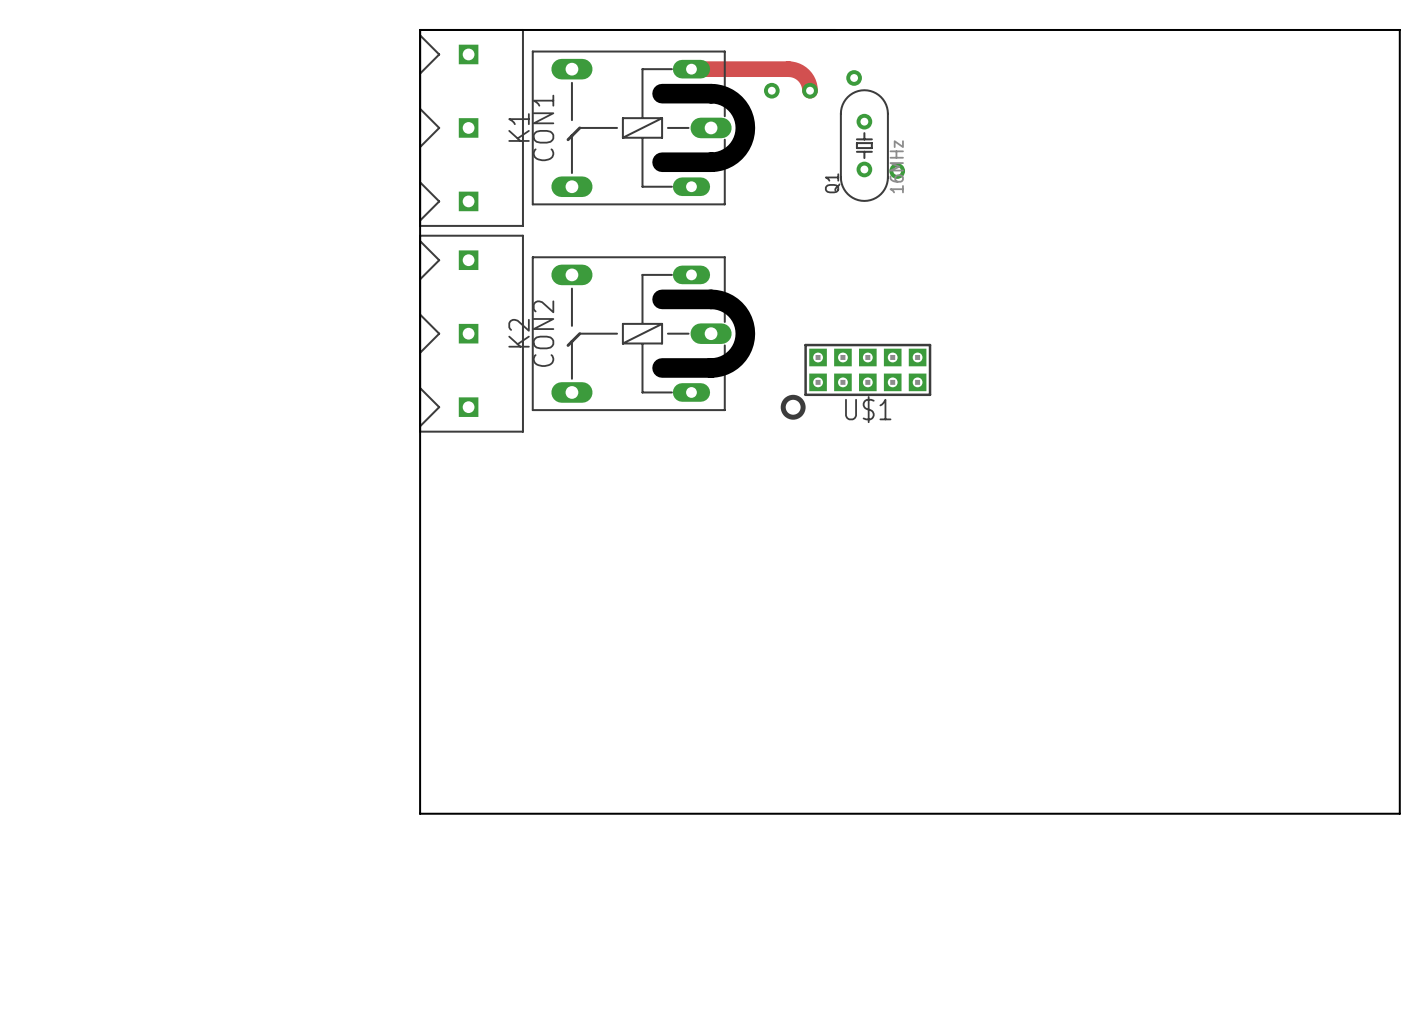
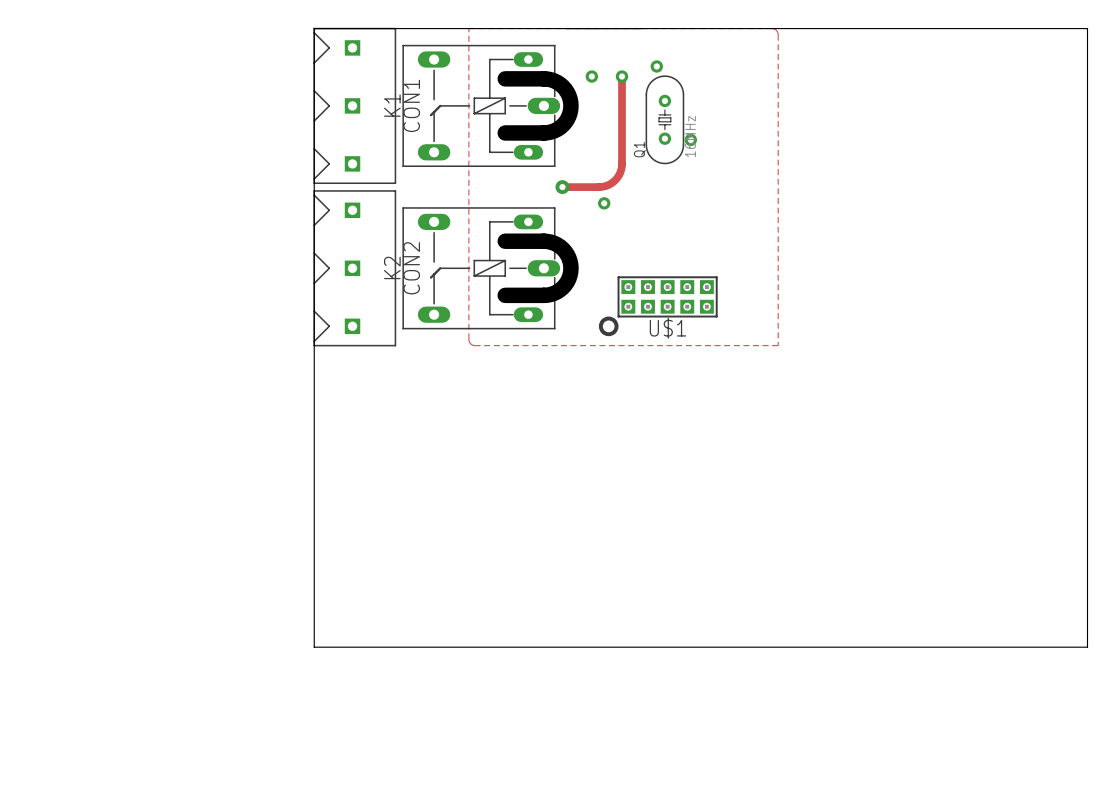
zone outline: none -> (468, 28) (772, 28) (776, 30) (778, 34) (778, 345) (475, 345) (470, 343) (468, 339) (468, 28)
track: (691, 69) (791, 69) (803, 75) (808, 82) (810, 90) -> (562, 187) (604, 186) (612, 182) (618, 175) (622, 163) (622, 76)
via: none -> (562, 187)
via: none -> (604, 203)

